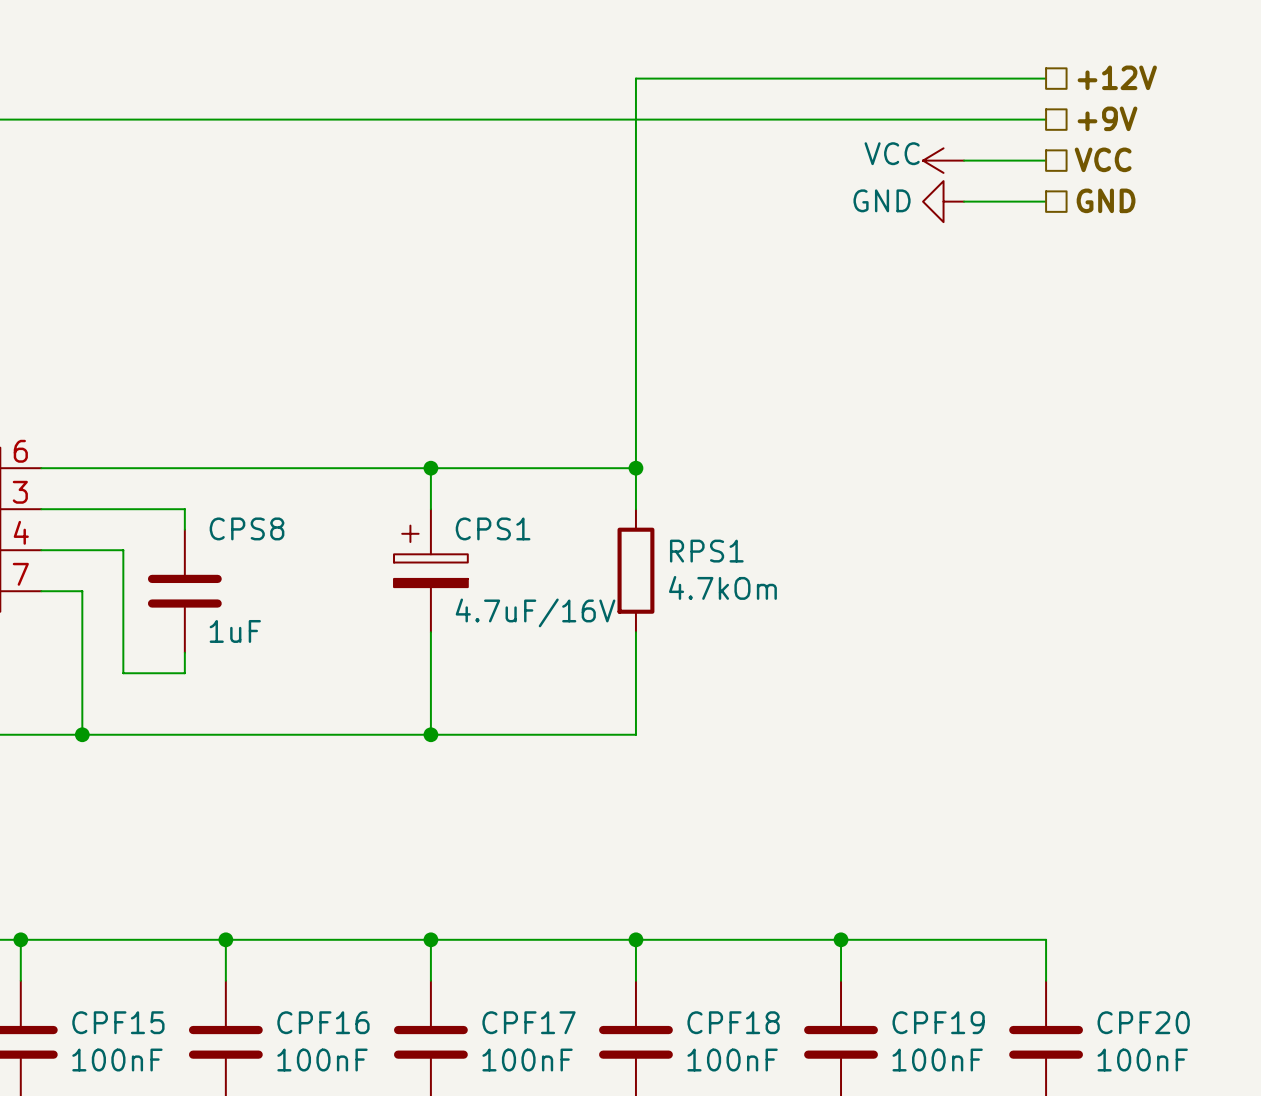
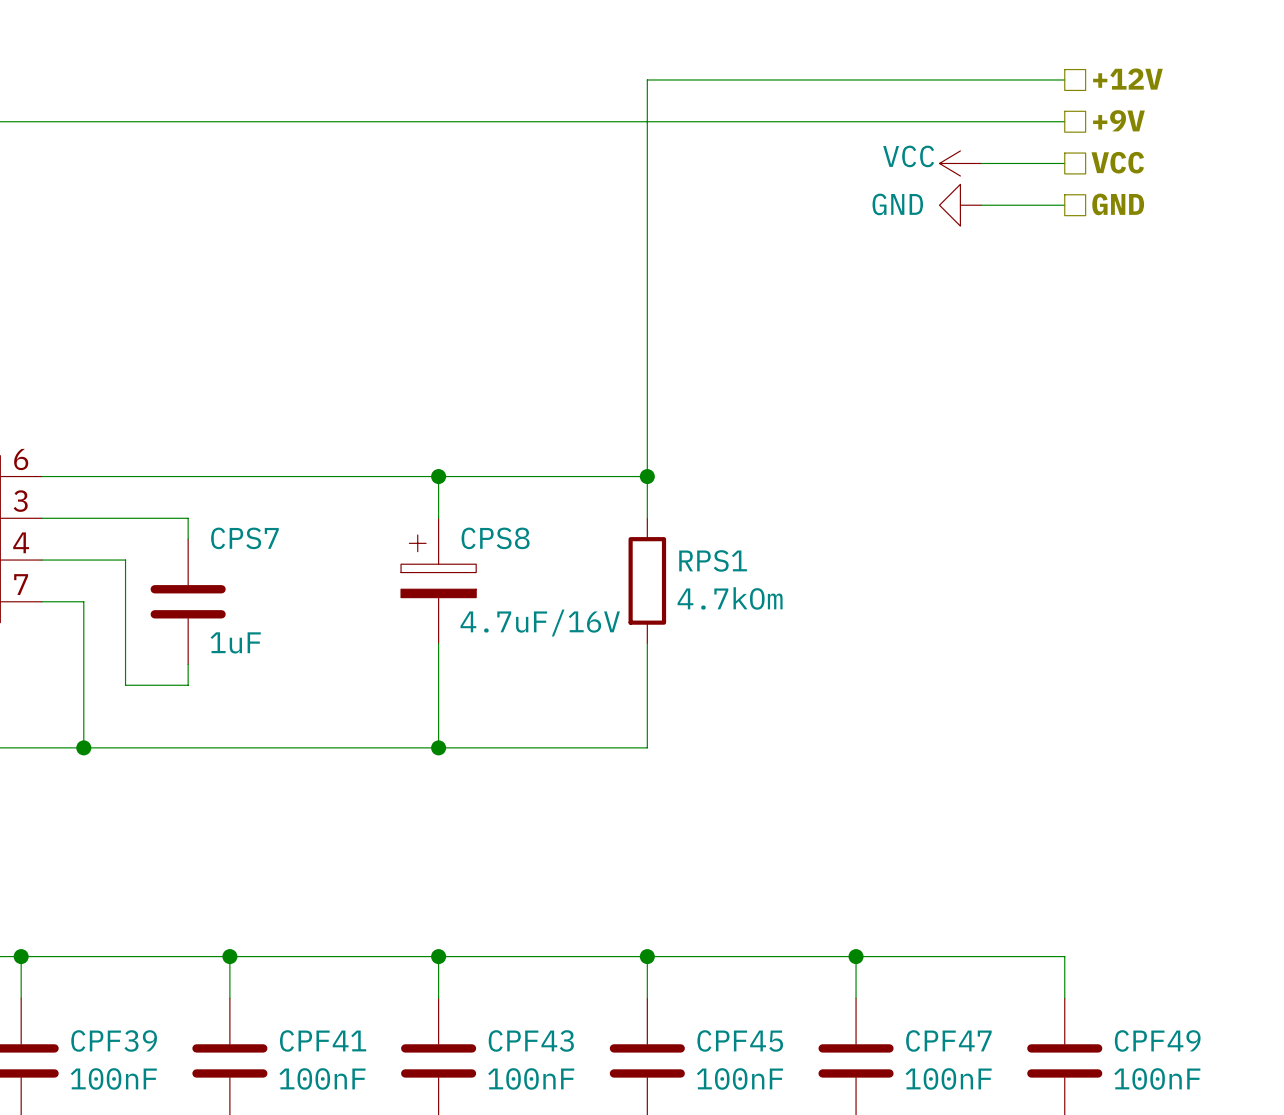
CPS8 name: CPS8 (247, 528) -> CPS7 (244, 538)
CPS1 name: CPS1 (493, 528) -> CPS8 (495, 538)
CPF15 name: CPF15 (118, 1022) -> CPF39 (114, 1040)
CPF16 name: CPF16 (323, 1022) -> CPF41 (323, 1040)
CPF17 name: CPF17 (529, 1022) -> CPF43 (531, 1040)
CPF18 name: CPF18 (733, 1022) -> CPF45 (740, 1040)
CPF19 name: CPF19 (938, 1022) -> CPF47 (948, 1040)
CPF20 name: CPF20 (1143, 1022) -> CPF49 (1157, 1040)

